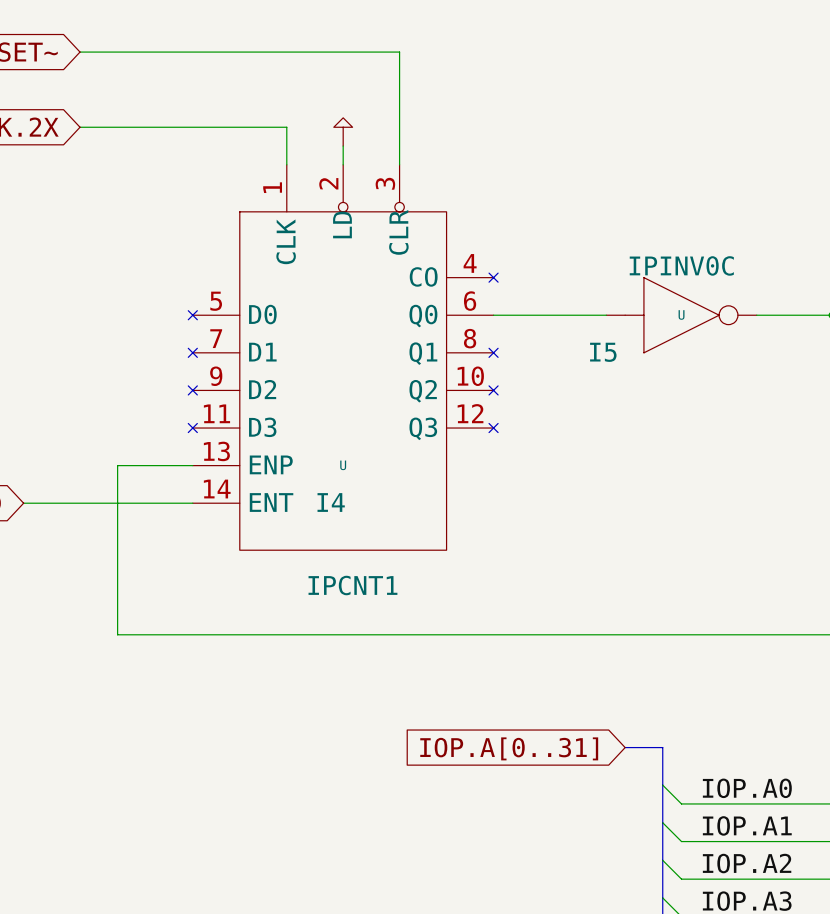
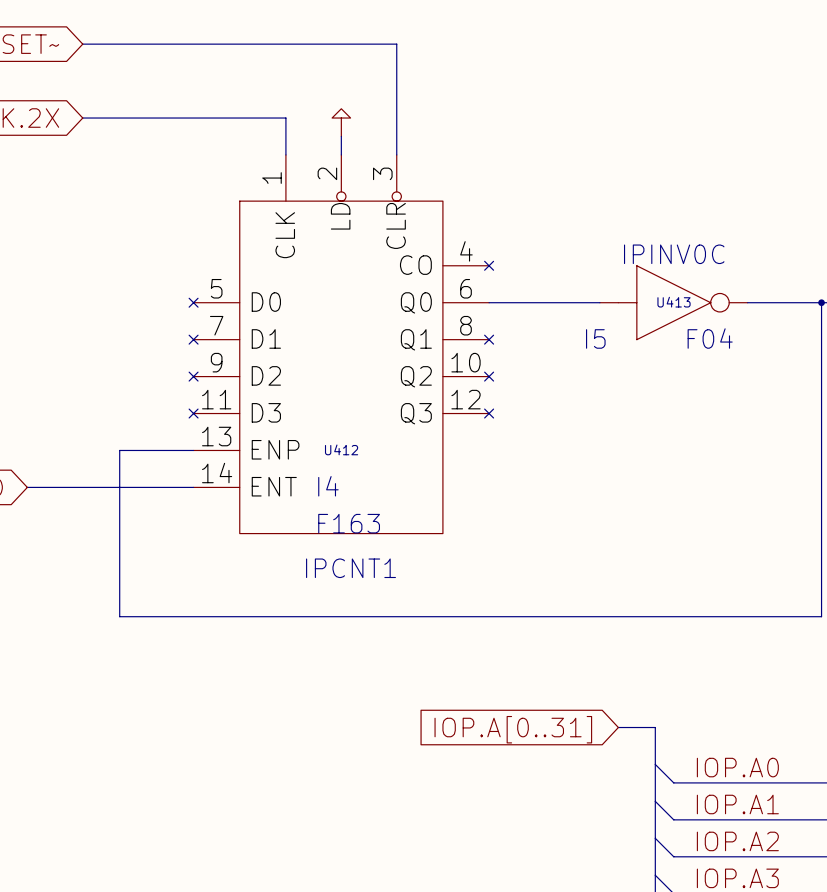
U name: U (681, 314) -> U413 (674, 302)
U value: none -> F04 (710, 338)
U name: U (343, 465) -> U412 (341, 449)
U value: none -> F163 (349, 523)

